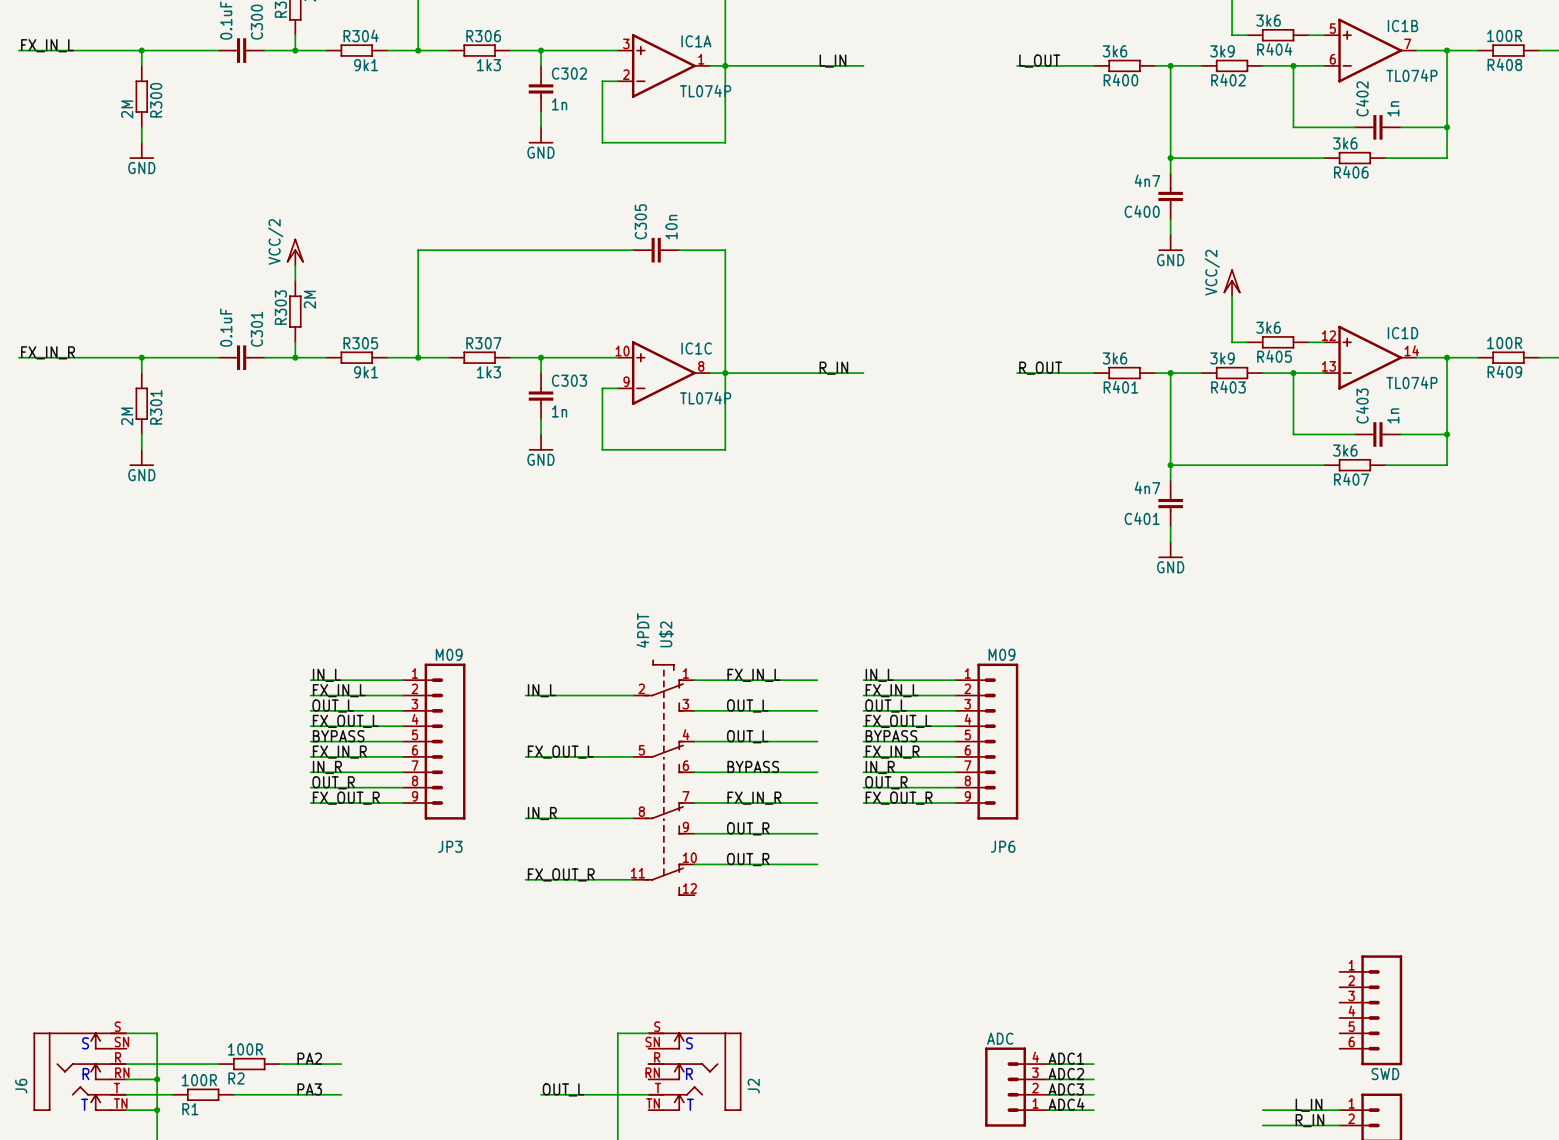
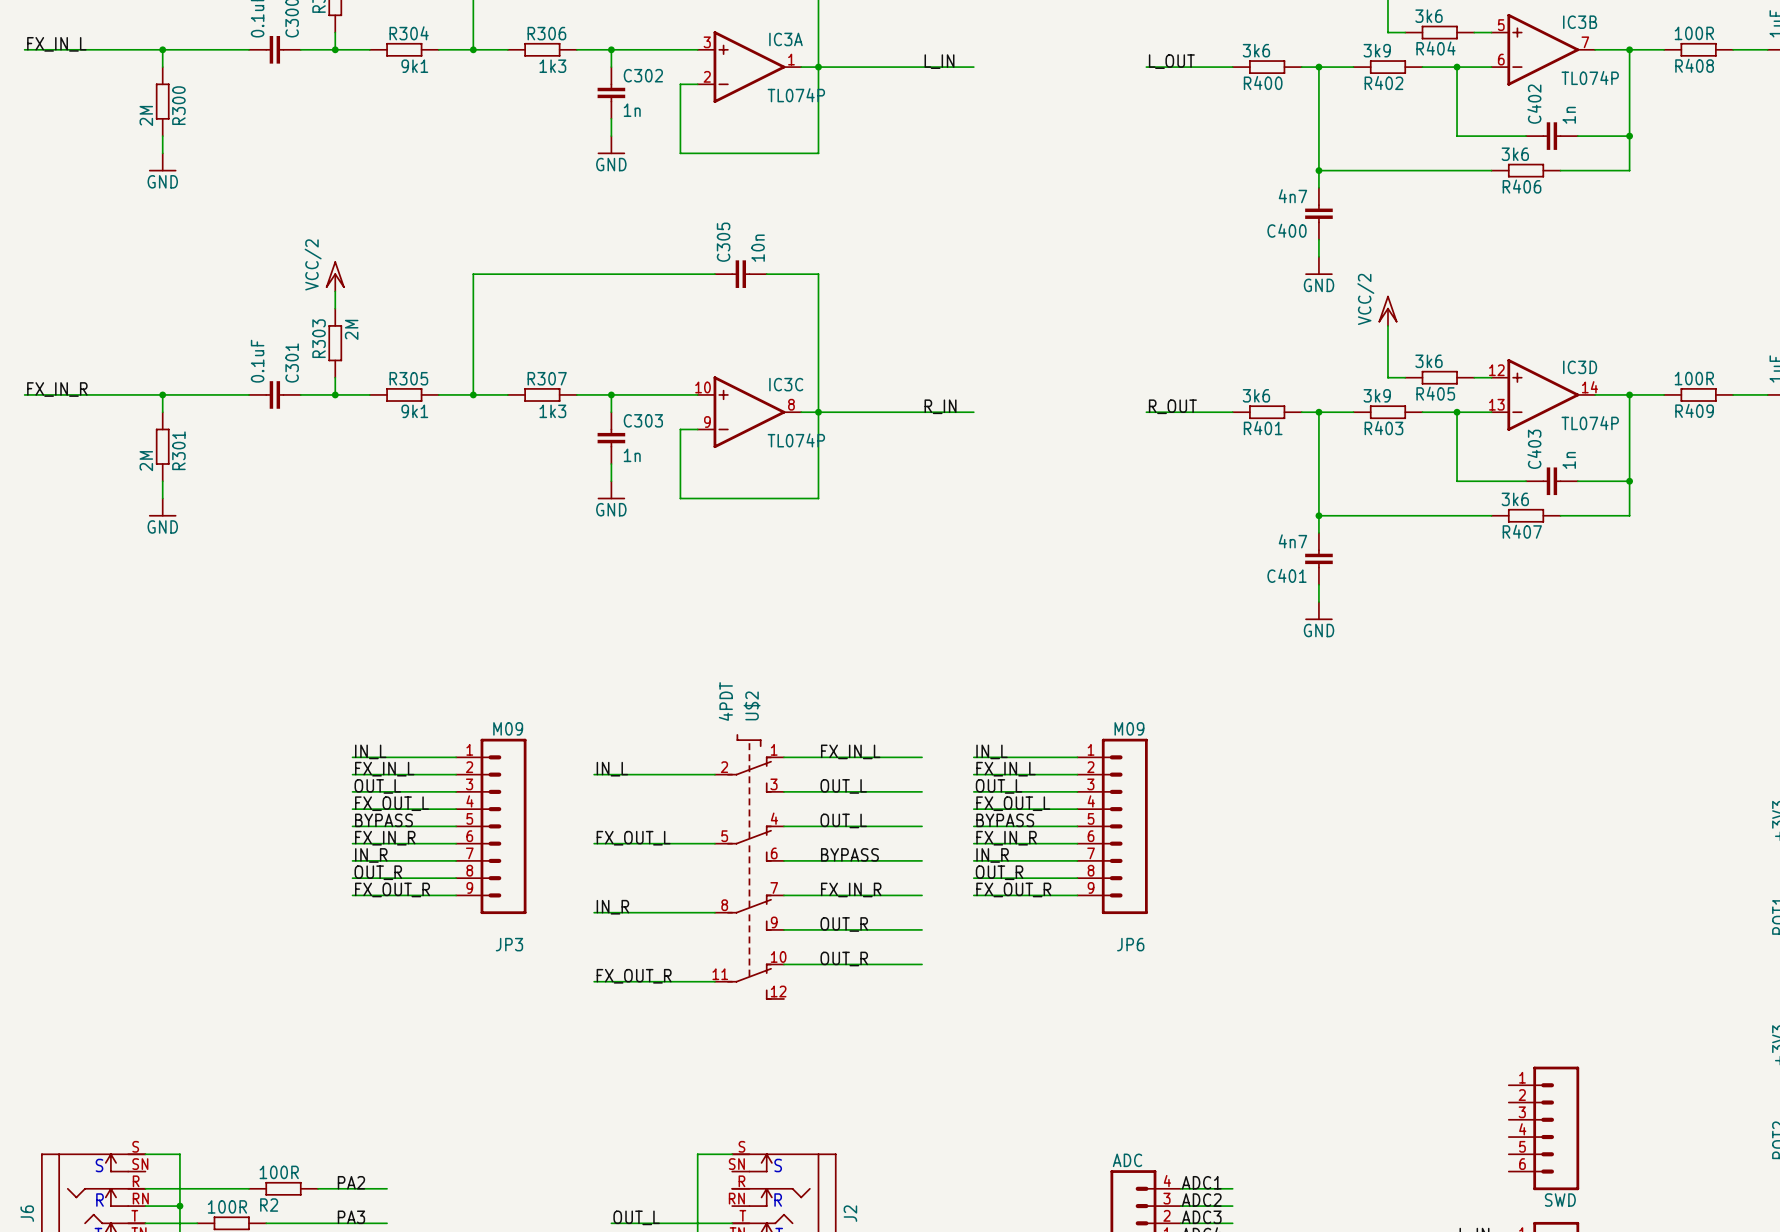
IC1B name: IC1B (1402, 26) -> IC3B (1580, 22)
IC1A name: IC1A (696, 41) -> IC3A (785, 39)
IC1D name: IC1D (1402, 333) -> IC3D (1580, 367)
IC1C name: IC1C (696, 348) -> IC3C (786, 384)

